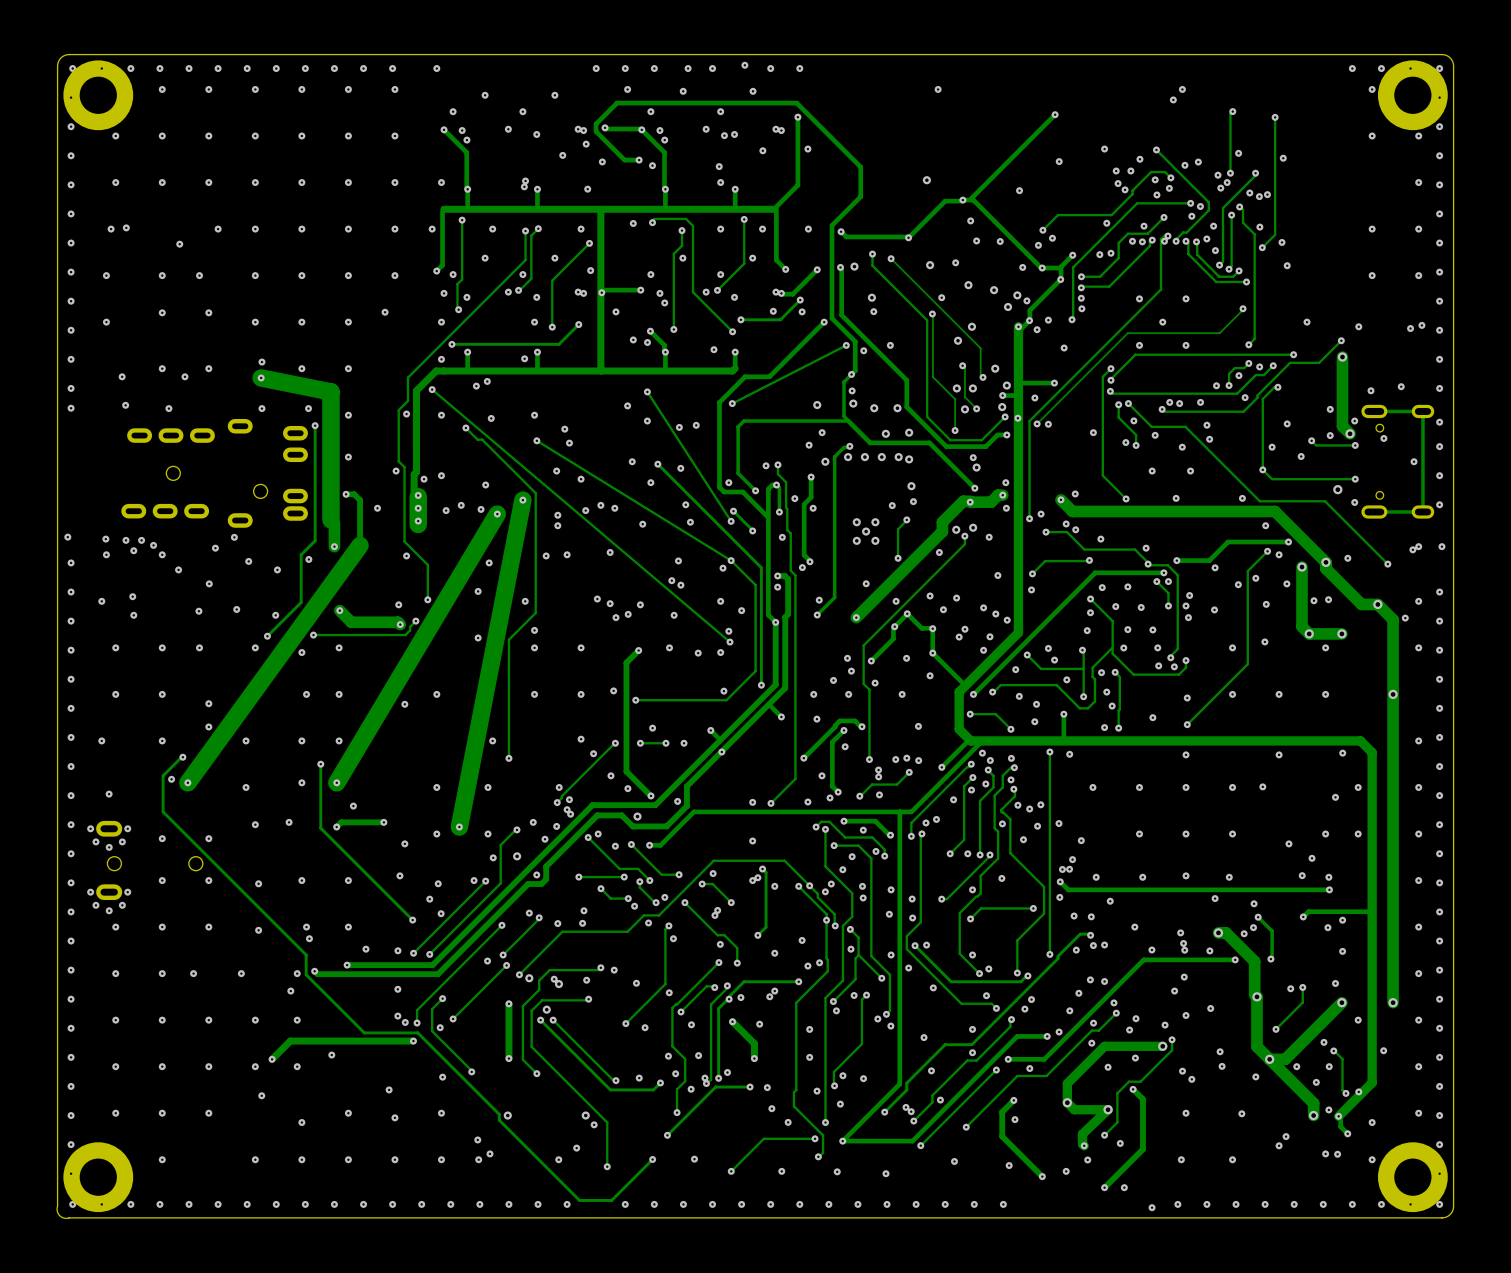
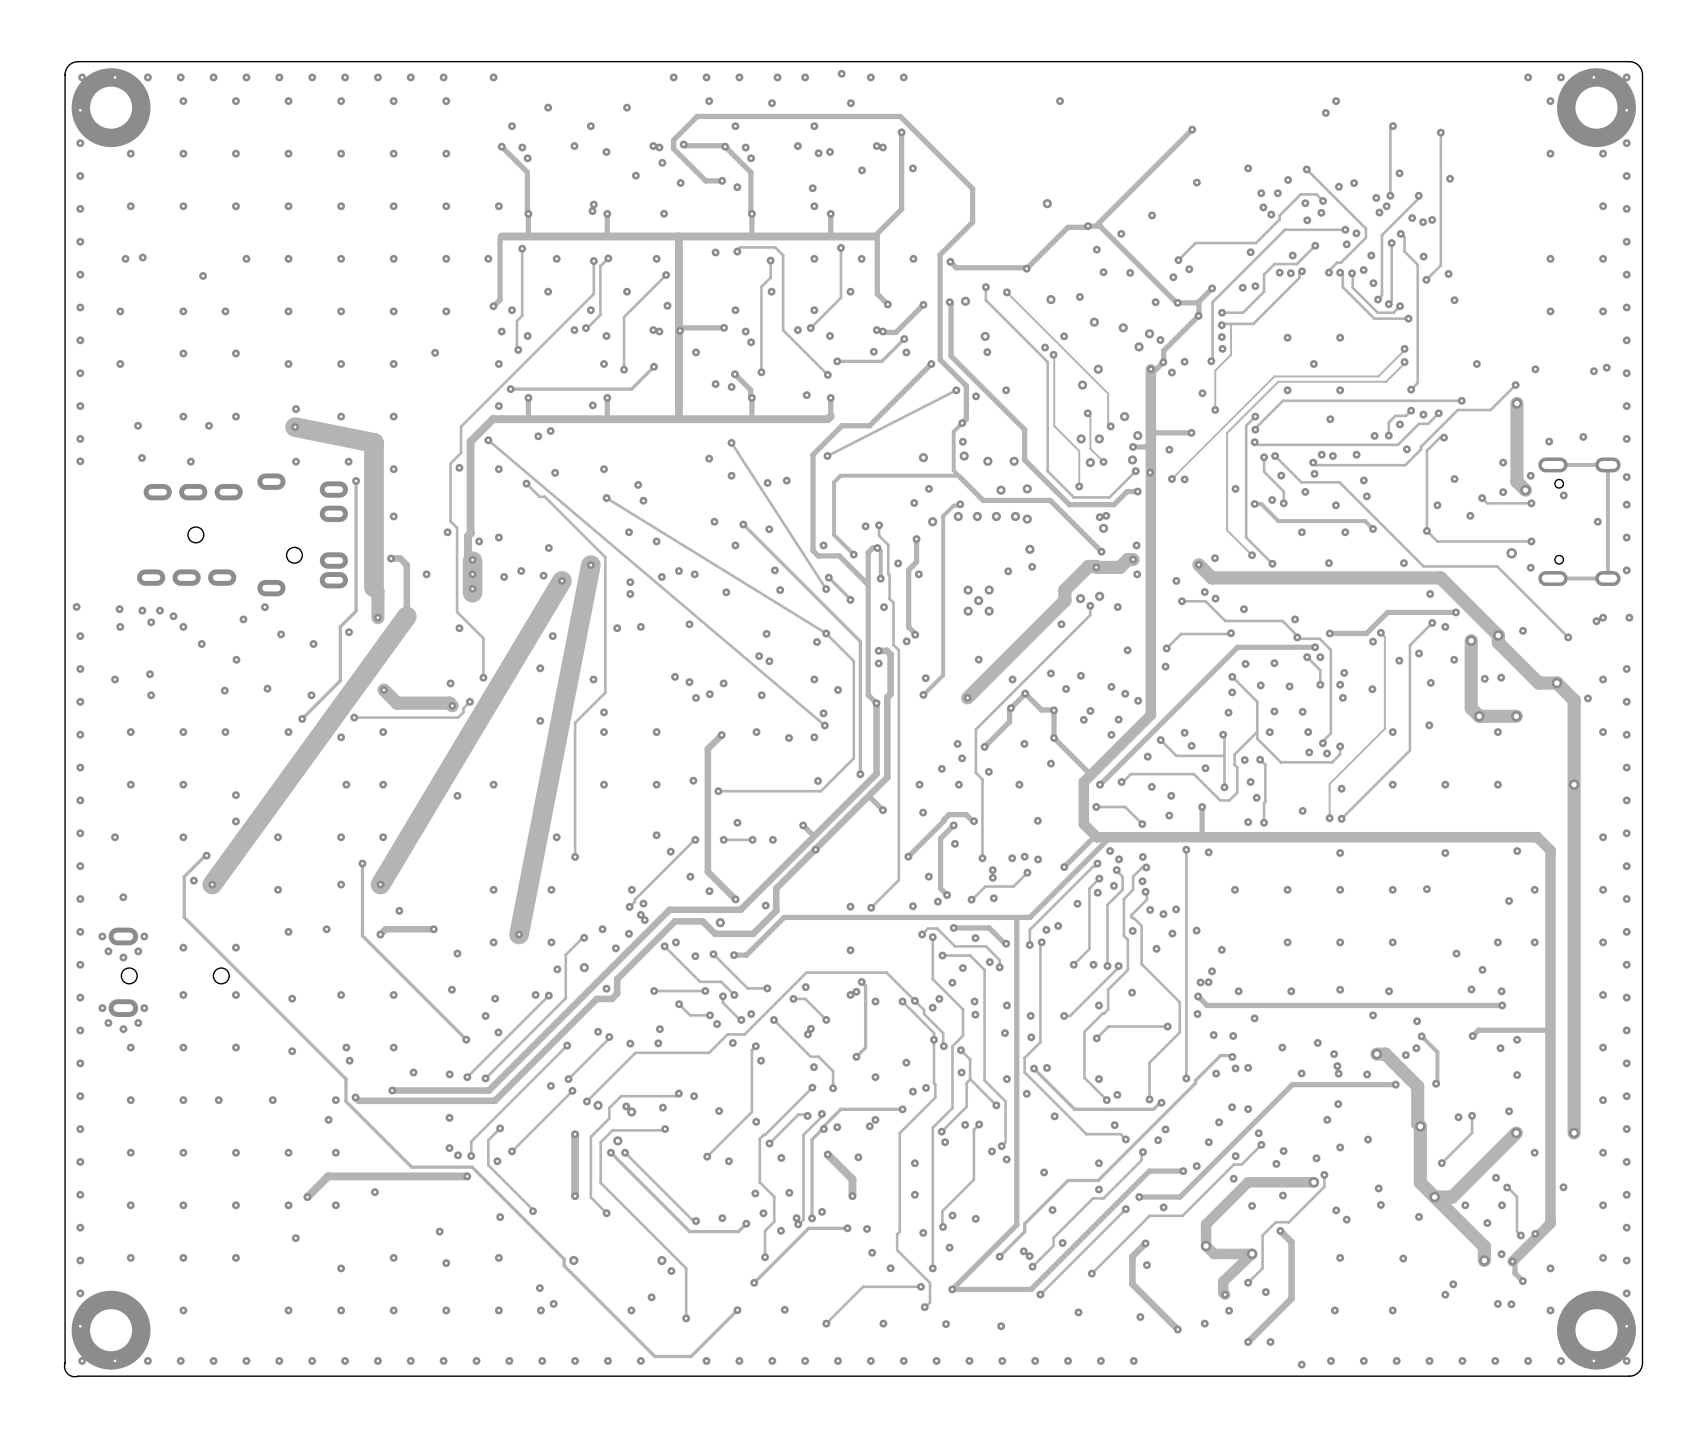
via: none -> (1121, 233)
track: (1167, 236) (1165, 234) (1161, 239) (1161, 289) (1029, 421) (1029, 518) -> none
via: (1167, 236) -> none
via: (1164, 241) -> none
track: none -> (1231, 324) (1231, 354) (1215, 370) (1215, 410)
via: none -> (1045, 347)
track: none -> (1404, 362) (1386, 381) (1278, 381) (1227, 433) (1227, 530) (1252, 555)
via: none -> (1404, 362)
via: none -> (1215, 410)
via: none -> (1330, 419)
via: none -> (1314, 473)
track: none -> (1254, 503) (1261, 503) (1278, 521) (1365, 521) (1373, 528)
via: none -> (1254, 503)
via: none -> (1106, 515)
via: none -> (1373, 528)
via: none -> (1252, 555)
via: (1029, 518) -> none
via: (906, 519) -> none
track: (906, 521) (898, 529) (898, 558) -> none
via: (898, 558) -> none
track: none -> (1380, 632) (1384, 636) (1384, 728) (1329, 783) (1329, 818)
via: none -> (1380, 632)
via: none -> (1329, 818)
via: none -> (1317, 1042)

